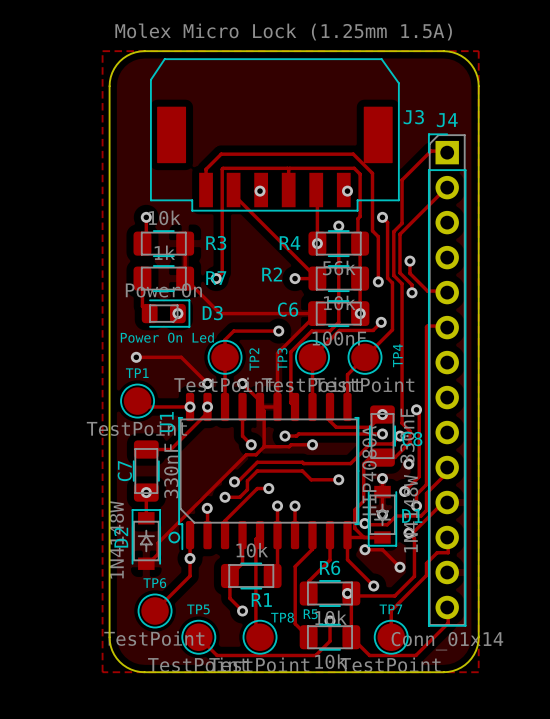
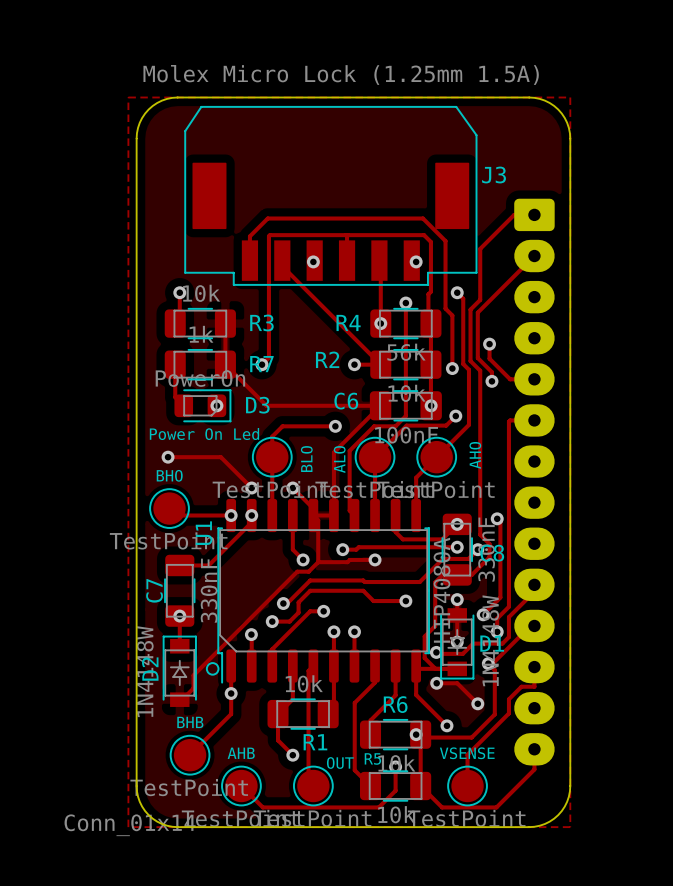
TP4 name: TP4 (397, 355) -> AHO (475, 455)
TP2 name: TP2 (254, 359) -> BLO (306, 459)
TP3 name: TP3 (282, 359) -> ALO (339, 459)
TP1 name: TP1 (137, 373) -> BHO (169, 475)
part: none -> Conn_01x14 (534, 482)
J4: Conn_01x14 (447, 380) -> none
via: (408, 464) -> none
TP6 name: TP6 (154, 583) -> BHB (190, 722)
TP5 name: TP5 (198, 609) -> AHB (241, 753)
TP7 name: TP7 (390, 609) -> VSENSE (467, 753)
TP8 name: TP8 (282, 617) -> OUT (340, 762)

